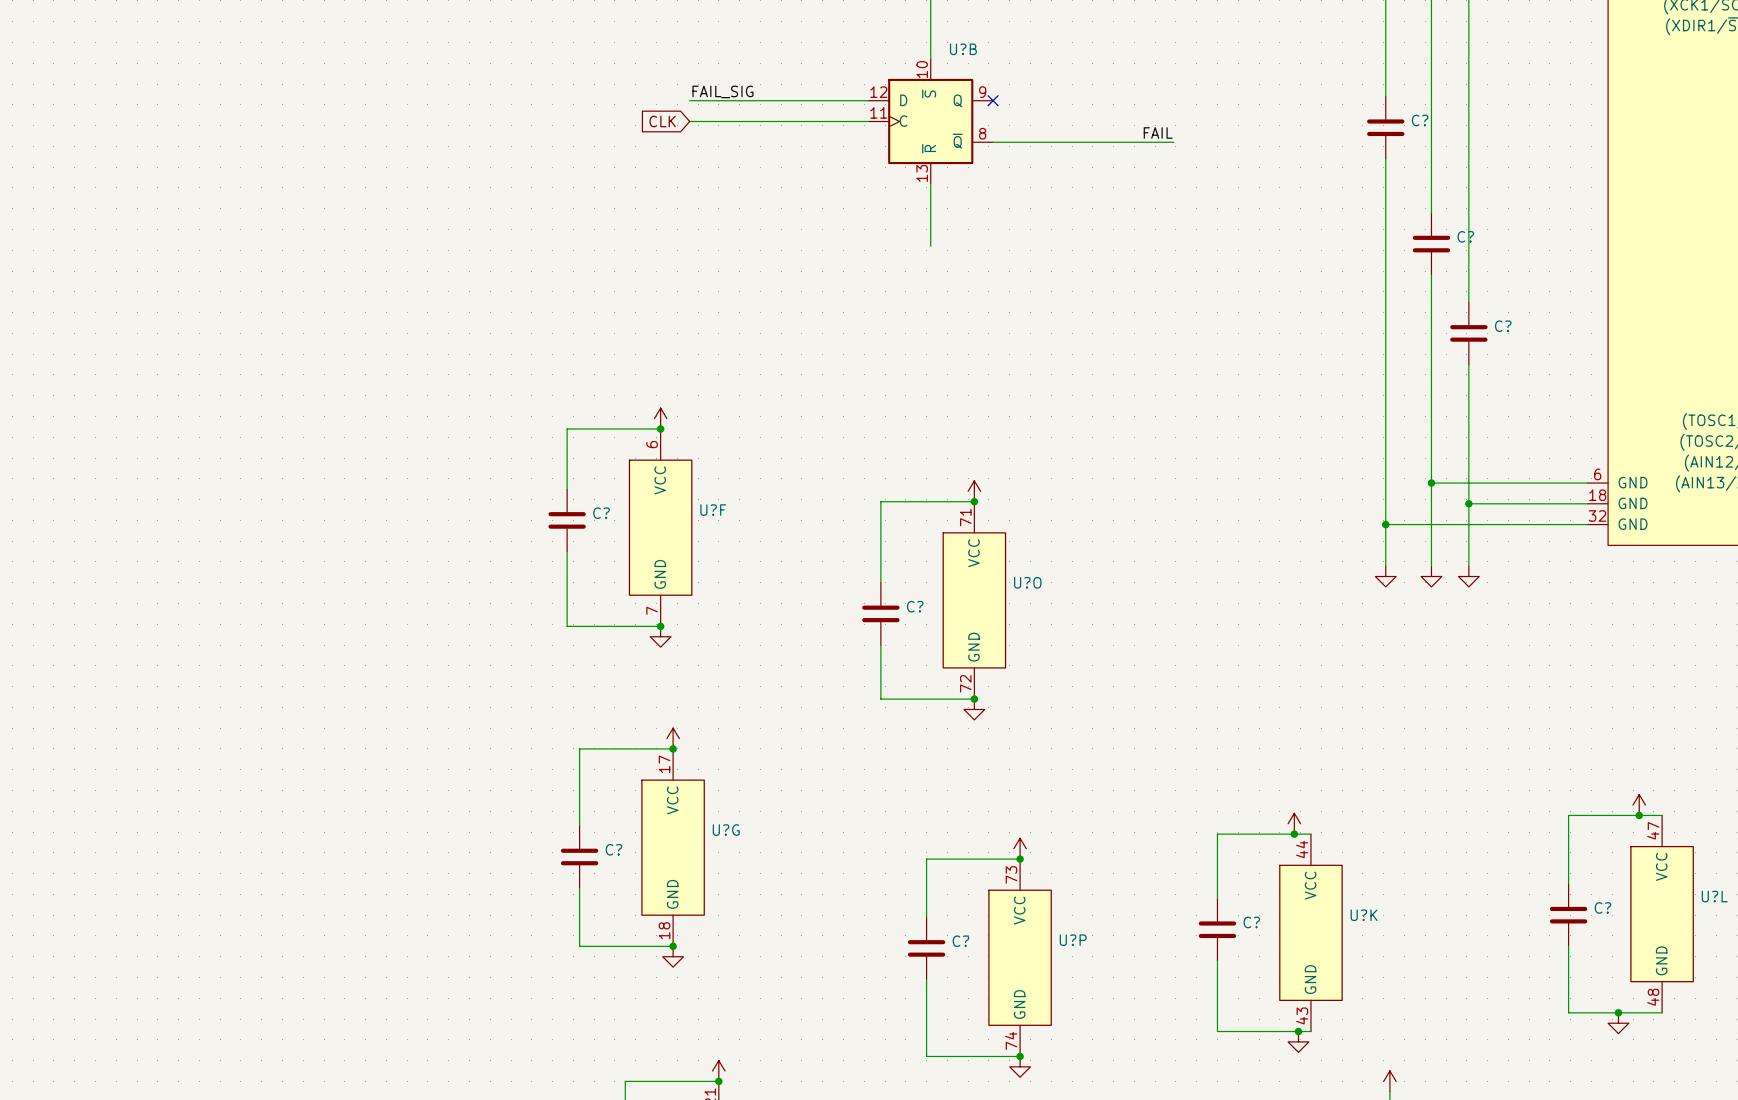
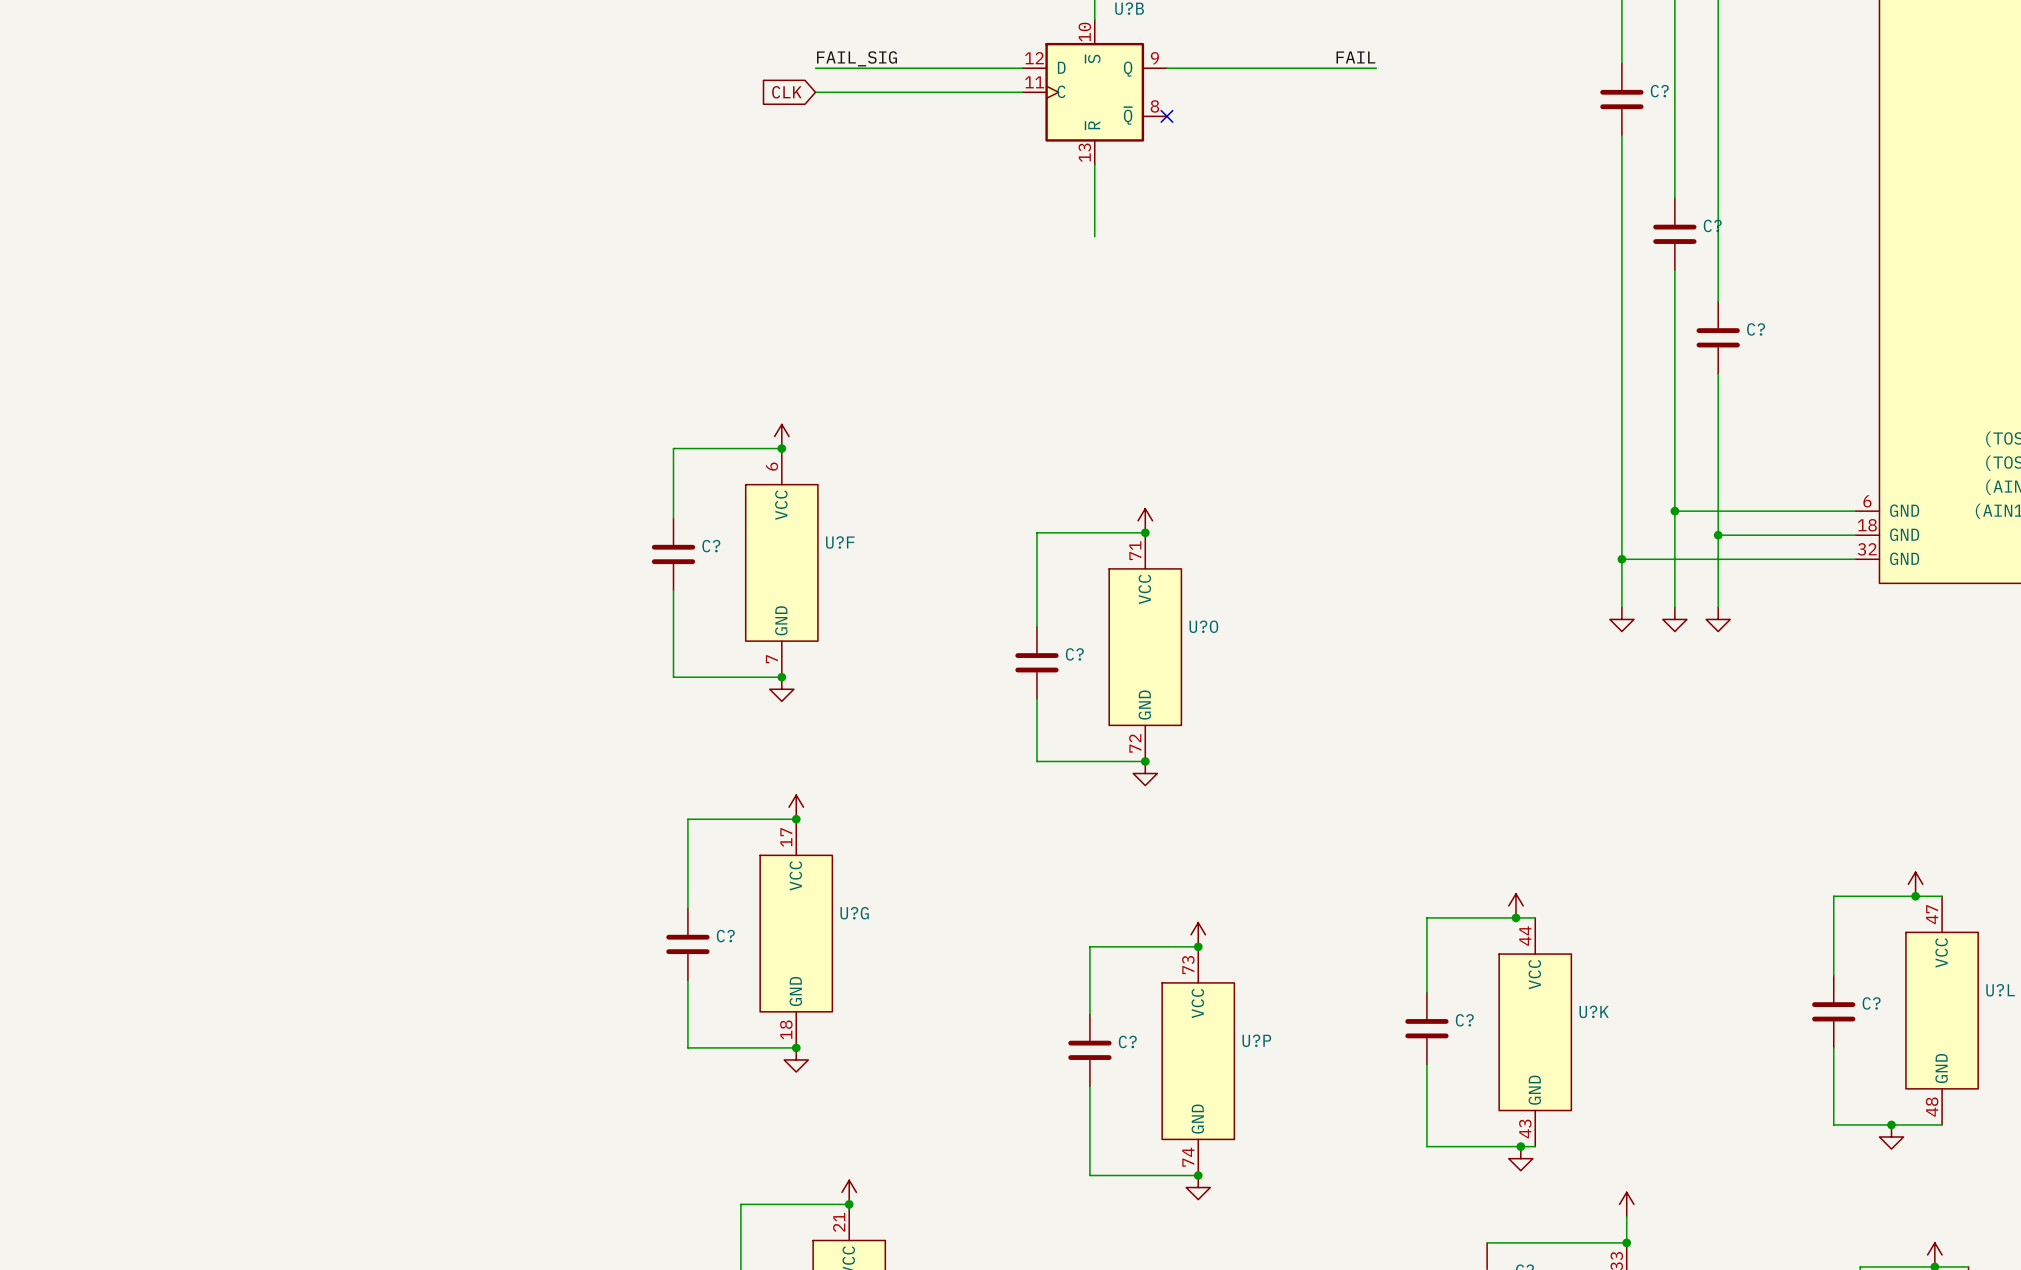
no-connect mark position: (993, 100) -> (1166, 116)
label position: FAIL (1158, 133) -> FAIL (1355, 57)
wire: (993, 142) (1173, 142) -> (1166, 68) (1376, 68)

